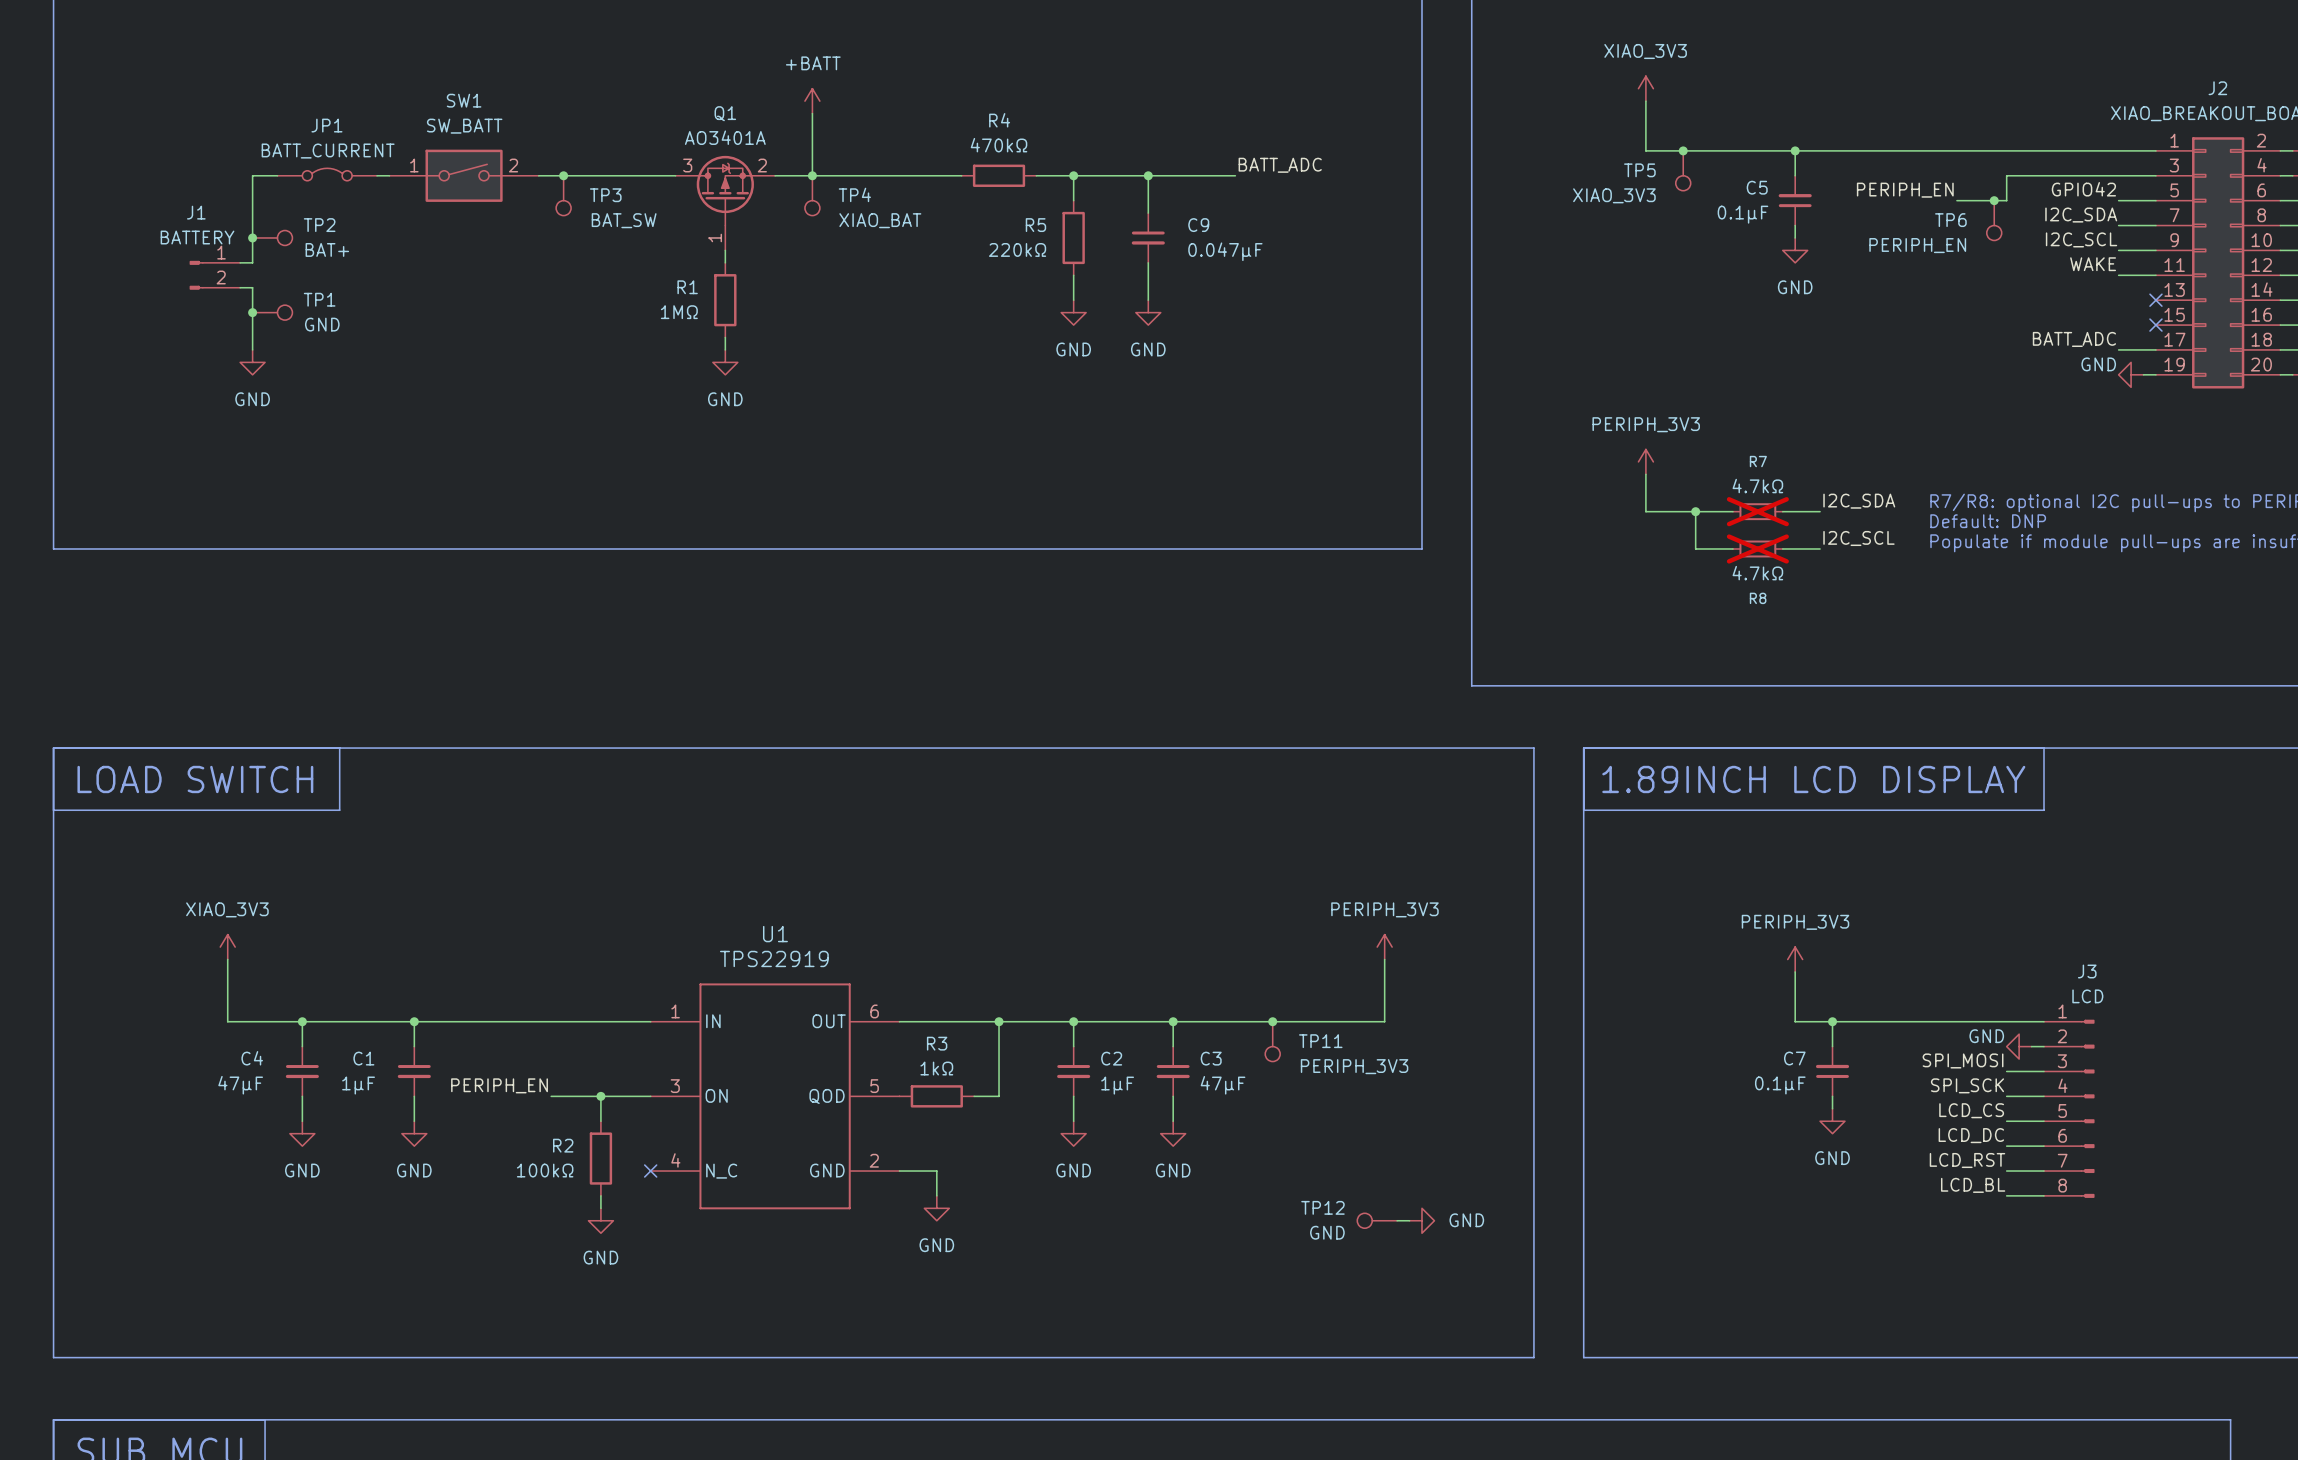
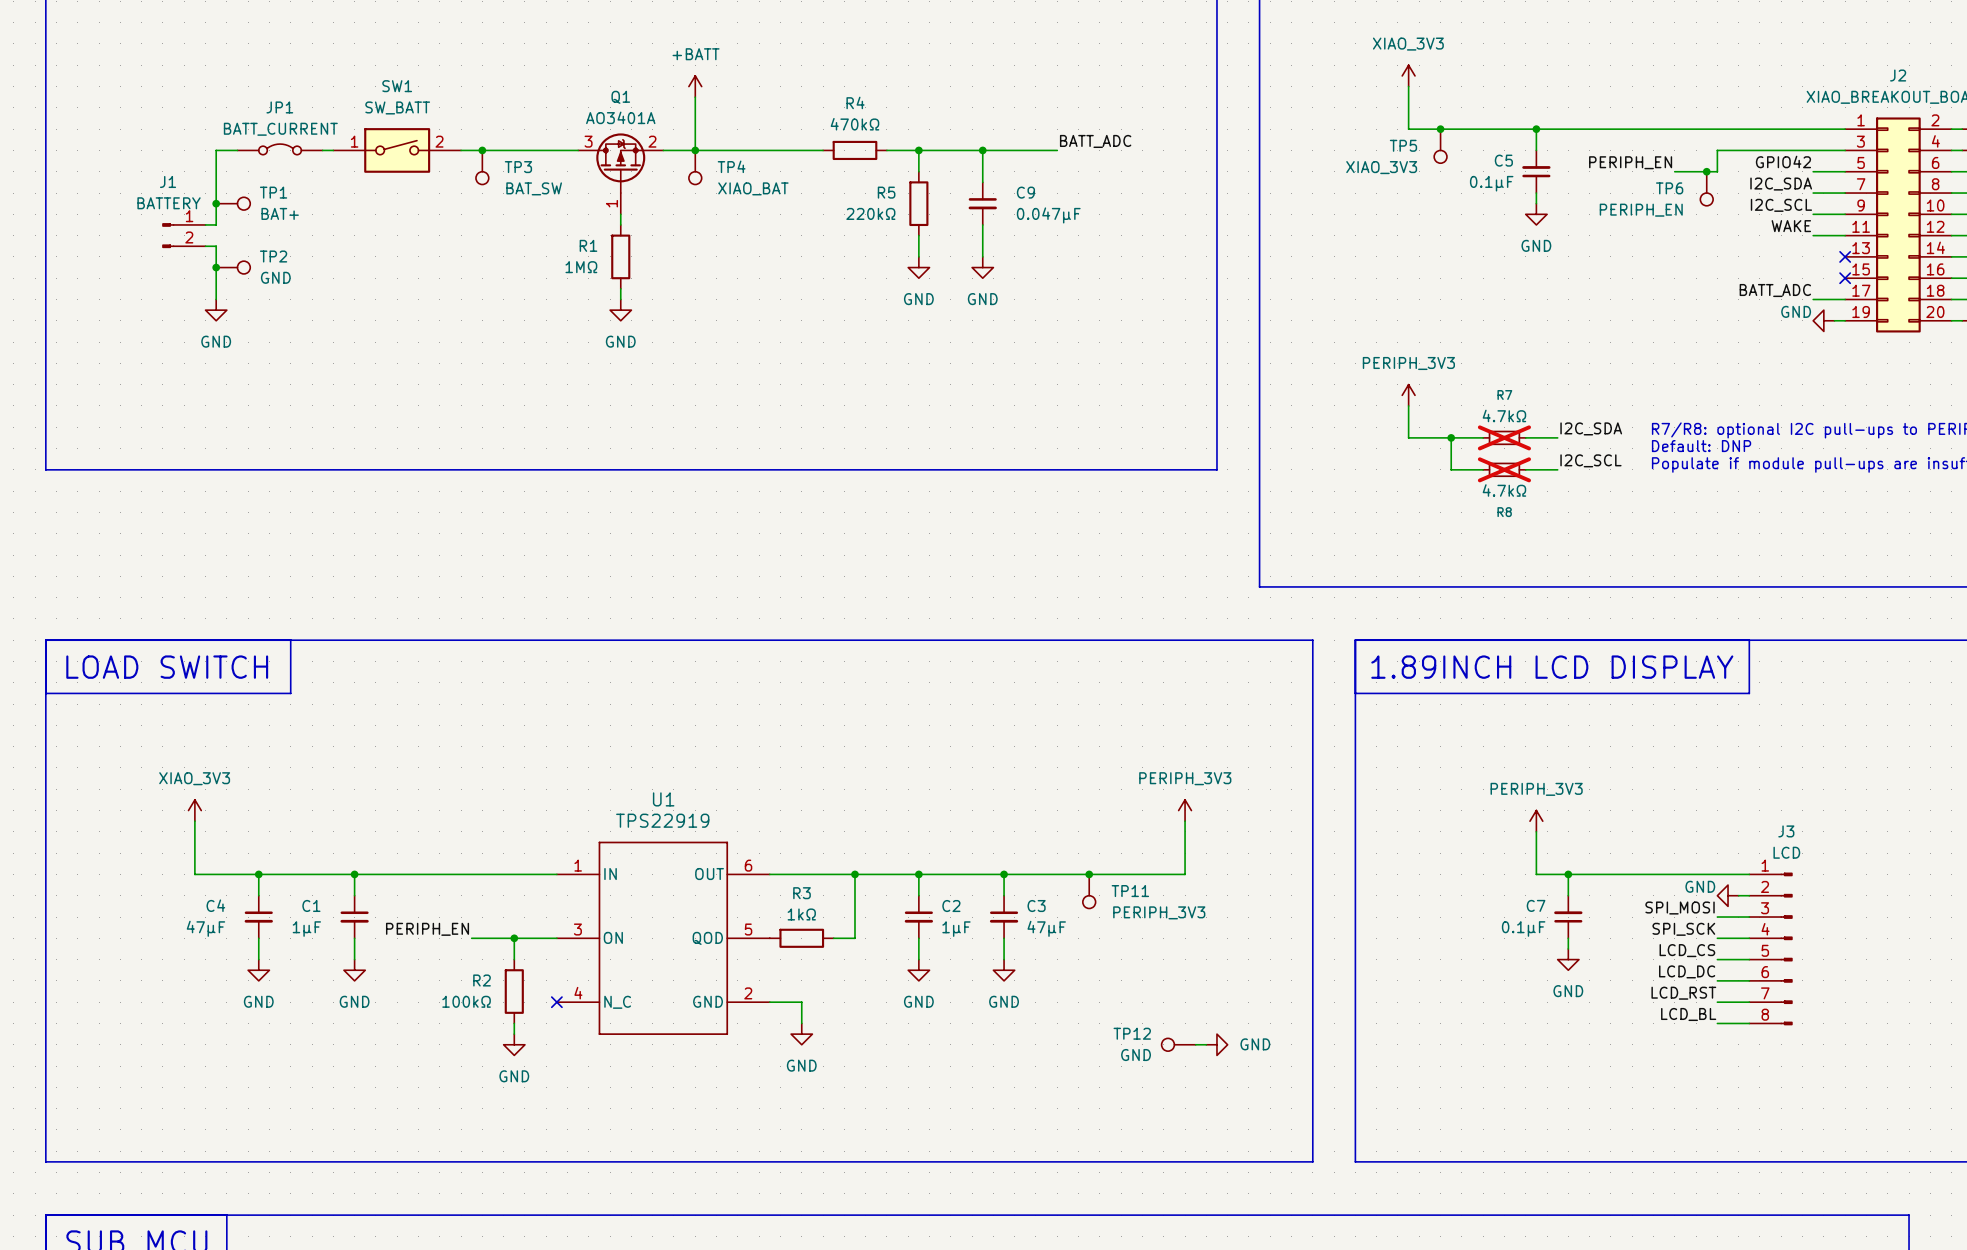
TP2 name: TP2 (319, 225) -> TP1 (273, 192)
TP1 name: TP1 (319, 299) -> TP2 (273, 256)

